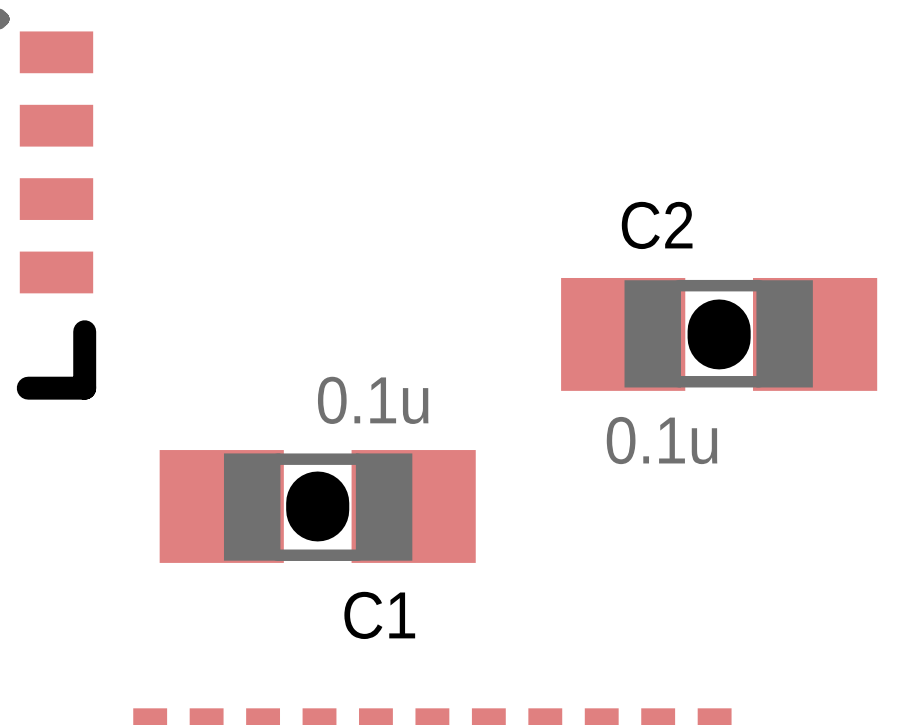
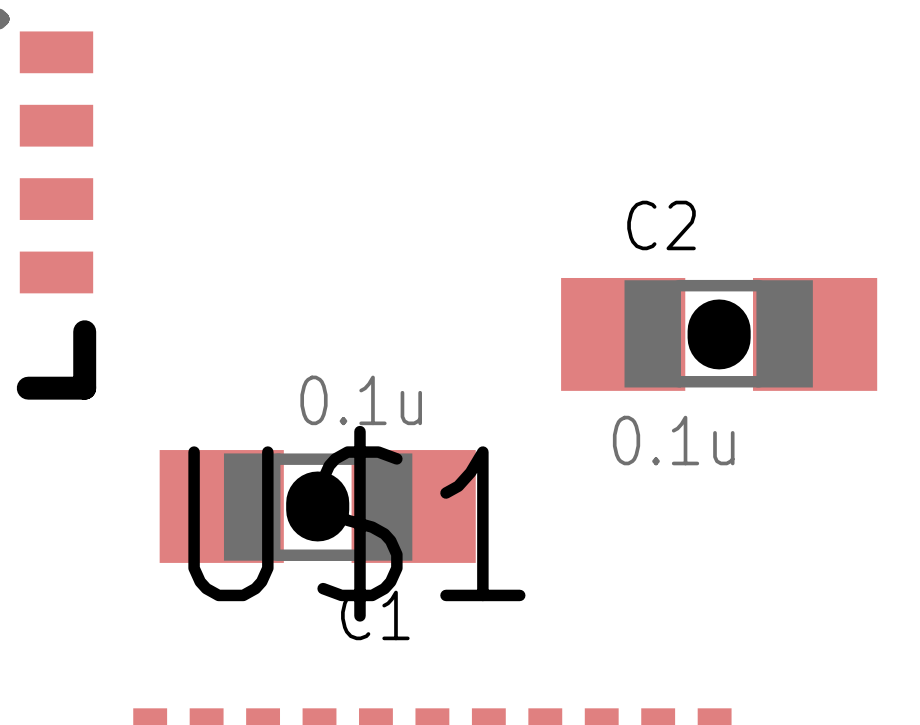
U$1 name: none -> U$1 (356, 523)

